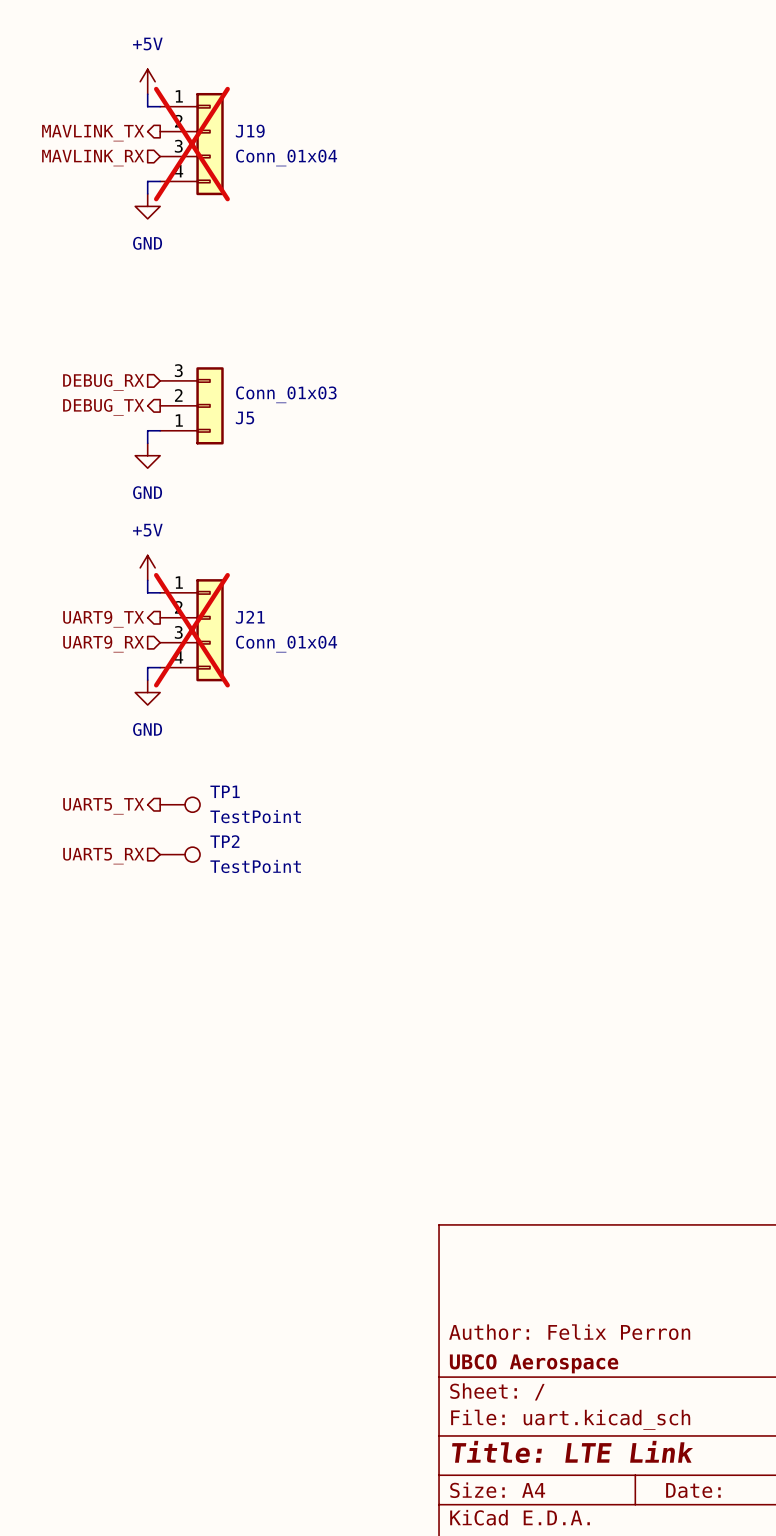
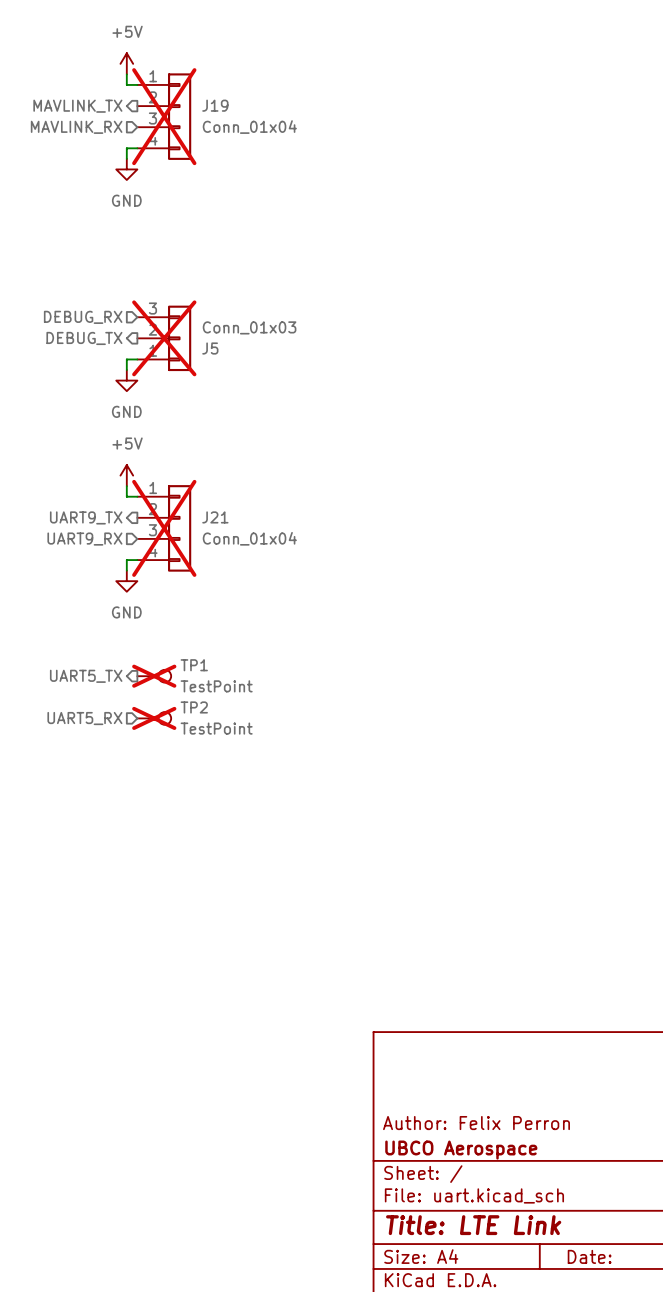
J5 do-not-place cross: none -> (164, 338)
TP1 do-not-place cross: none -> (154, 676)
TP2 do-not-place cross: none -> (154, 718)

